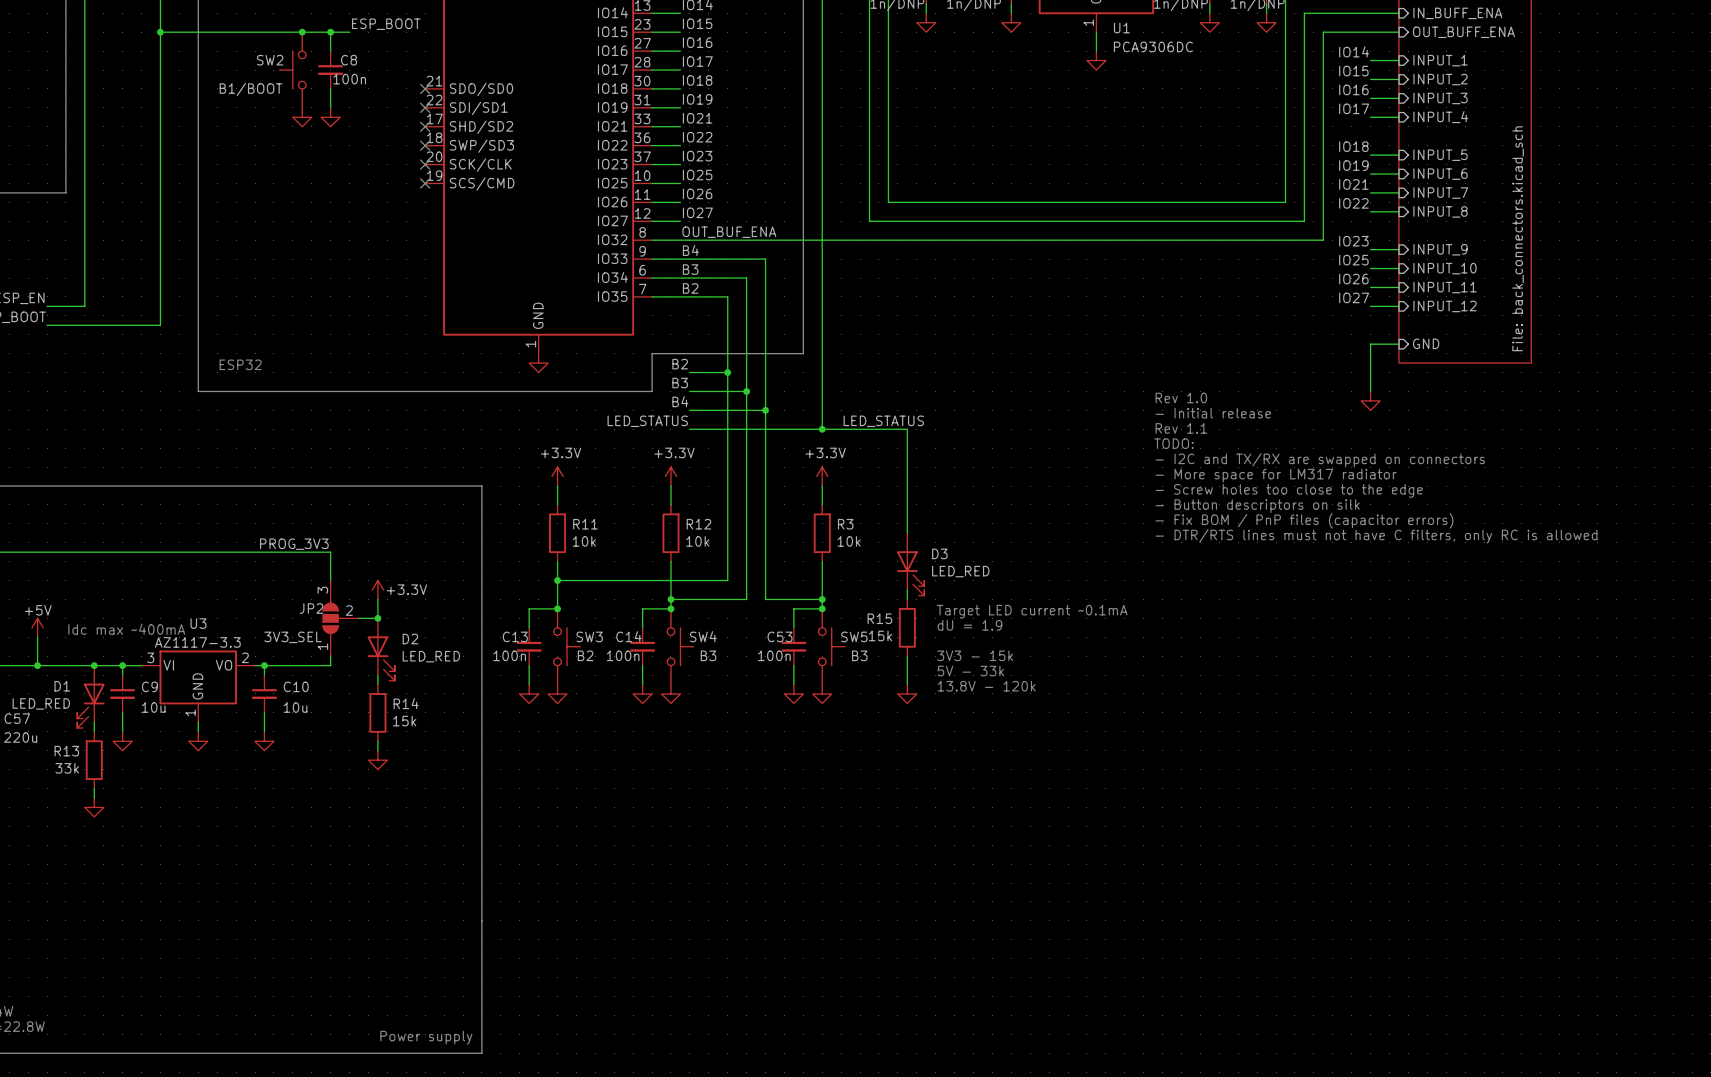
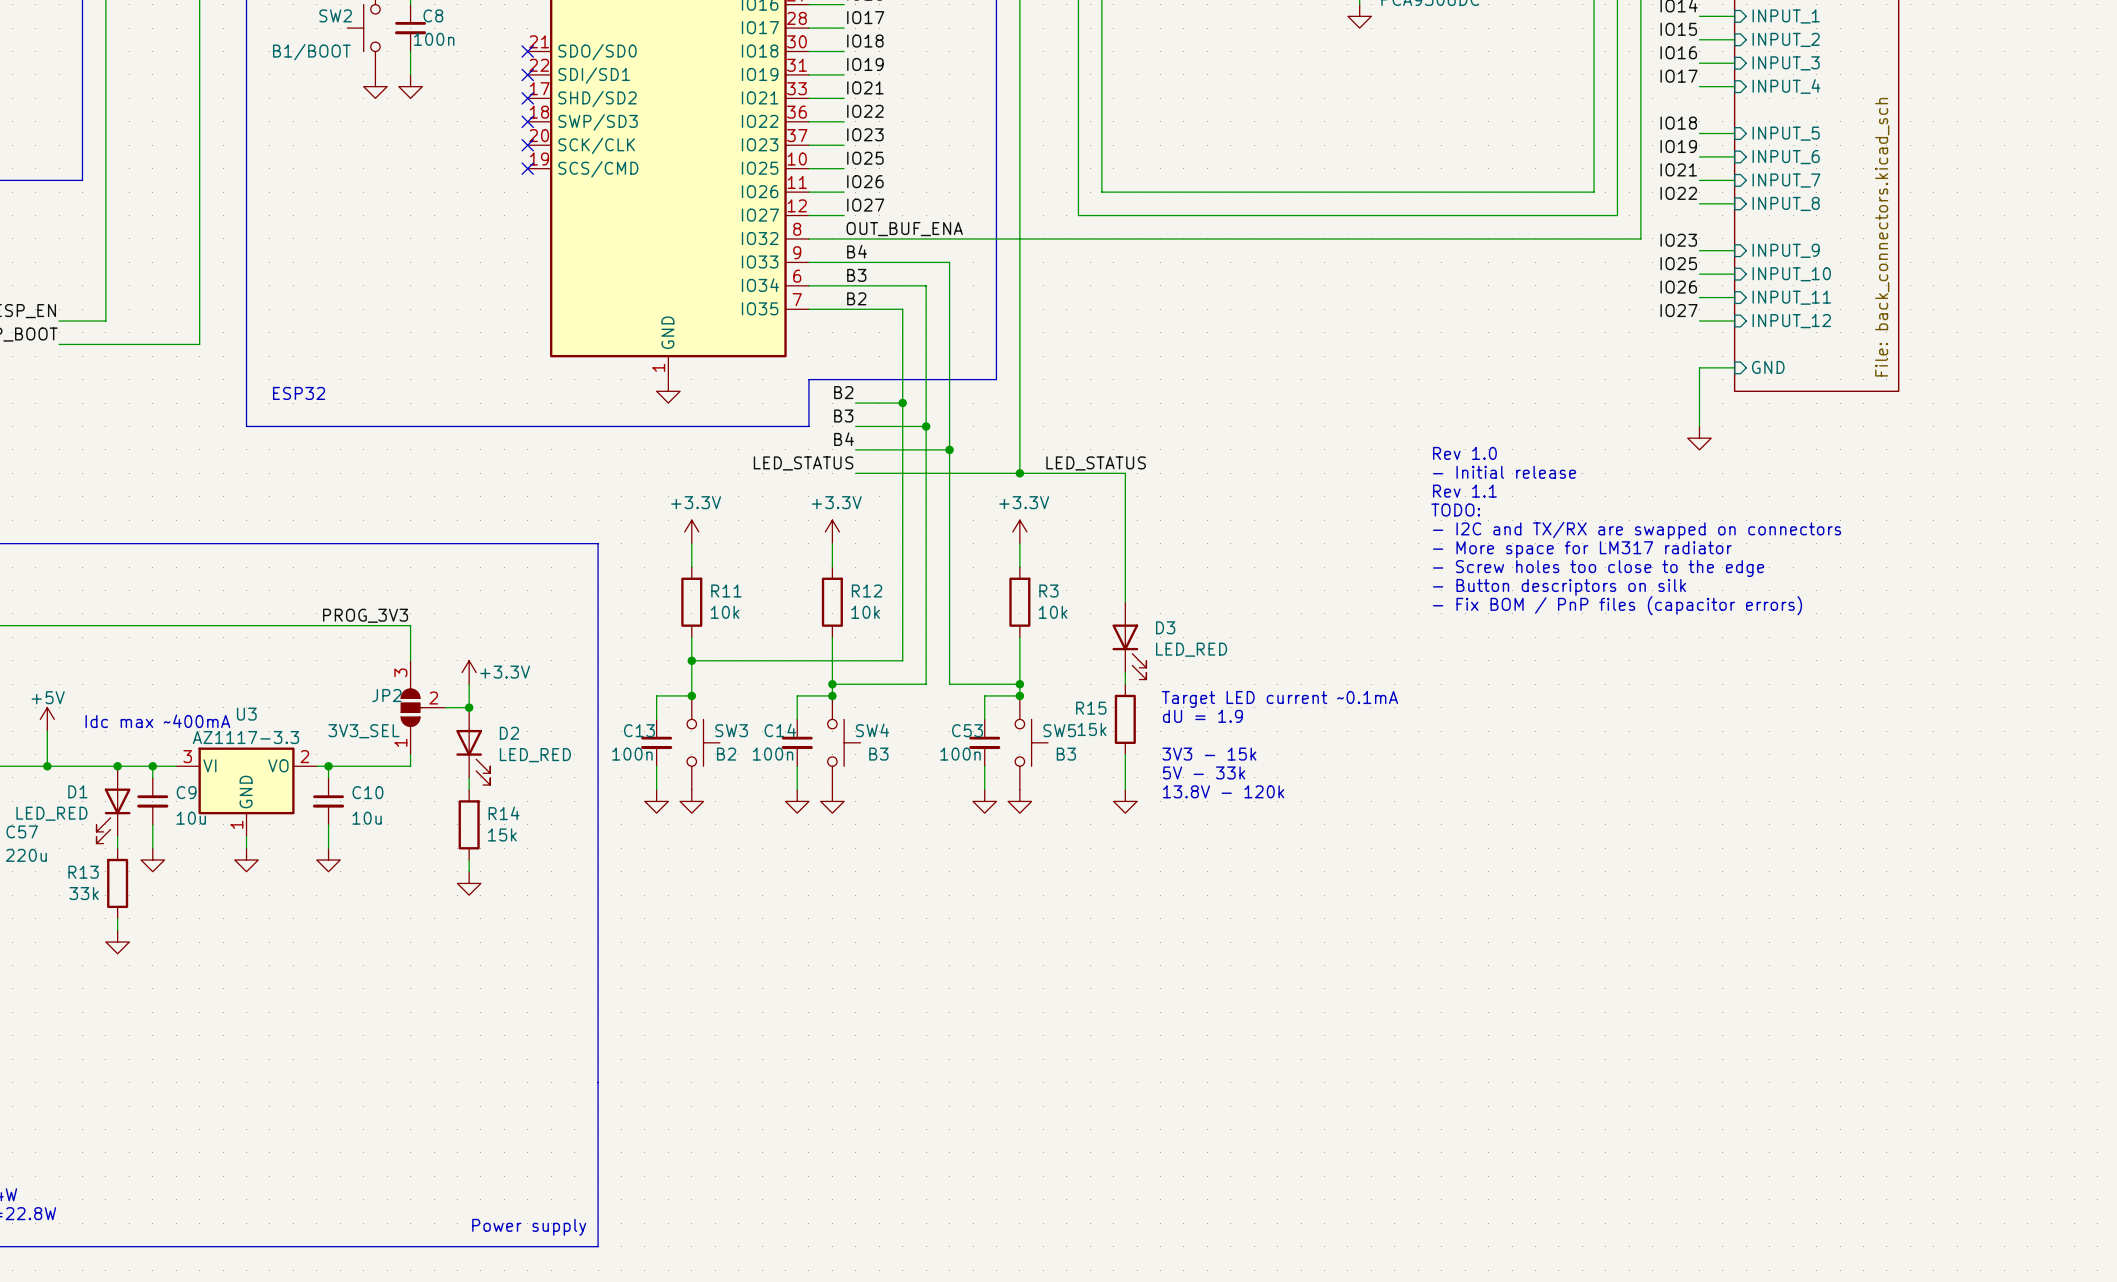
text: Rev 1.0 (1181, 397) -> none
text: - Initial release (1213, 413) -> Rev 1.0 (1464, 453)
text: Rev 1.1 (1181, 428) -> - Initial release (1504, 472)
text: TODO: (1173, 443) -> Rev 1.1 (1464, 491)
text: - I2C and TX/RX are swapped on connectors (1320, 460) -> TODO: (1455, 510)
text: - More space for LM317 radiator (1276, 475) -> - I2C and TX/RX are swapped on connectors (1637, 530)
text: - Screw holes too close to the edge (1289, 490) -> - More space for LM317 radiator (1582, 549)
text: - Button descriptors on silk (1257, 506) -> - Screw holes too close to the edge (1598, 568)
text: - Fix BOM / PnP files (capacitor errors) (1304, 520) -> - Button descriptors on silk (1559, 587)
text: - DTR/RTS lines must not have C filters, only RC is allowed (1376, 536) -> - Fix BOM / PnP files (capacitor errors) (1617, 605)

